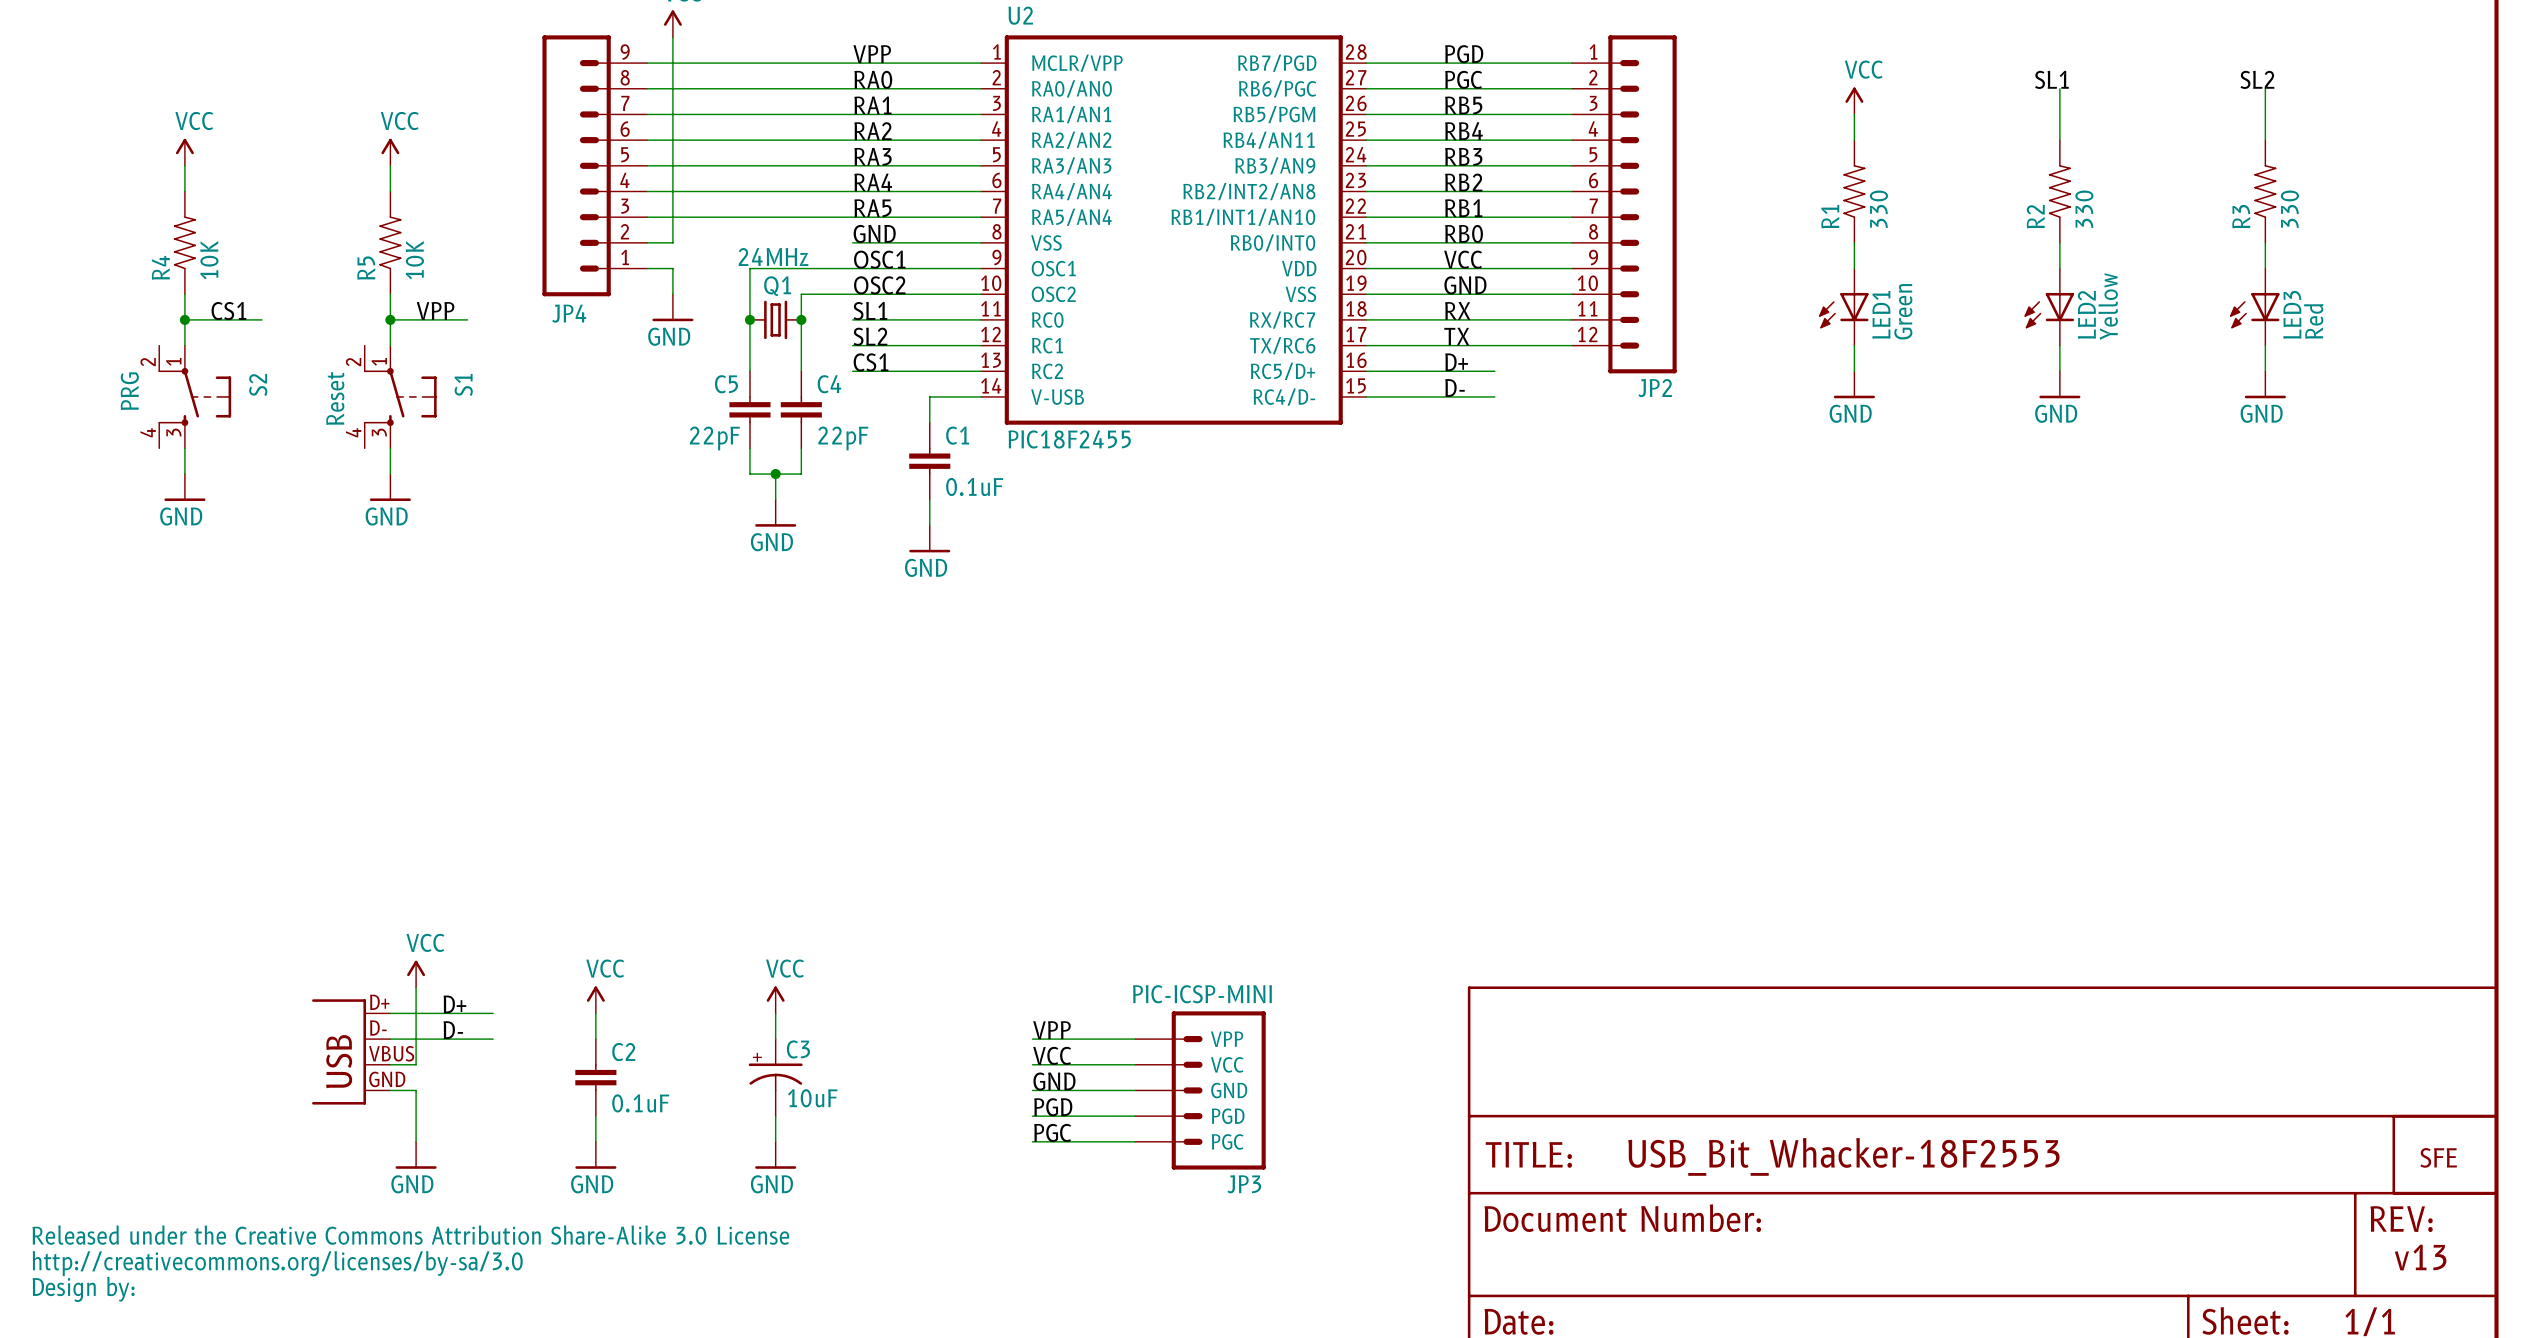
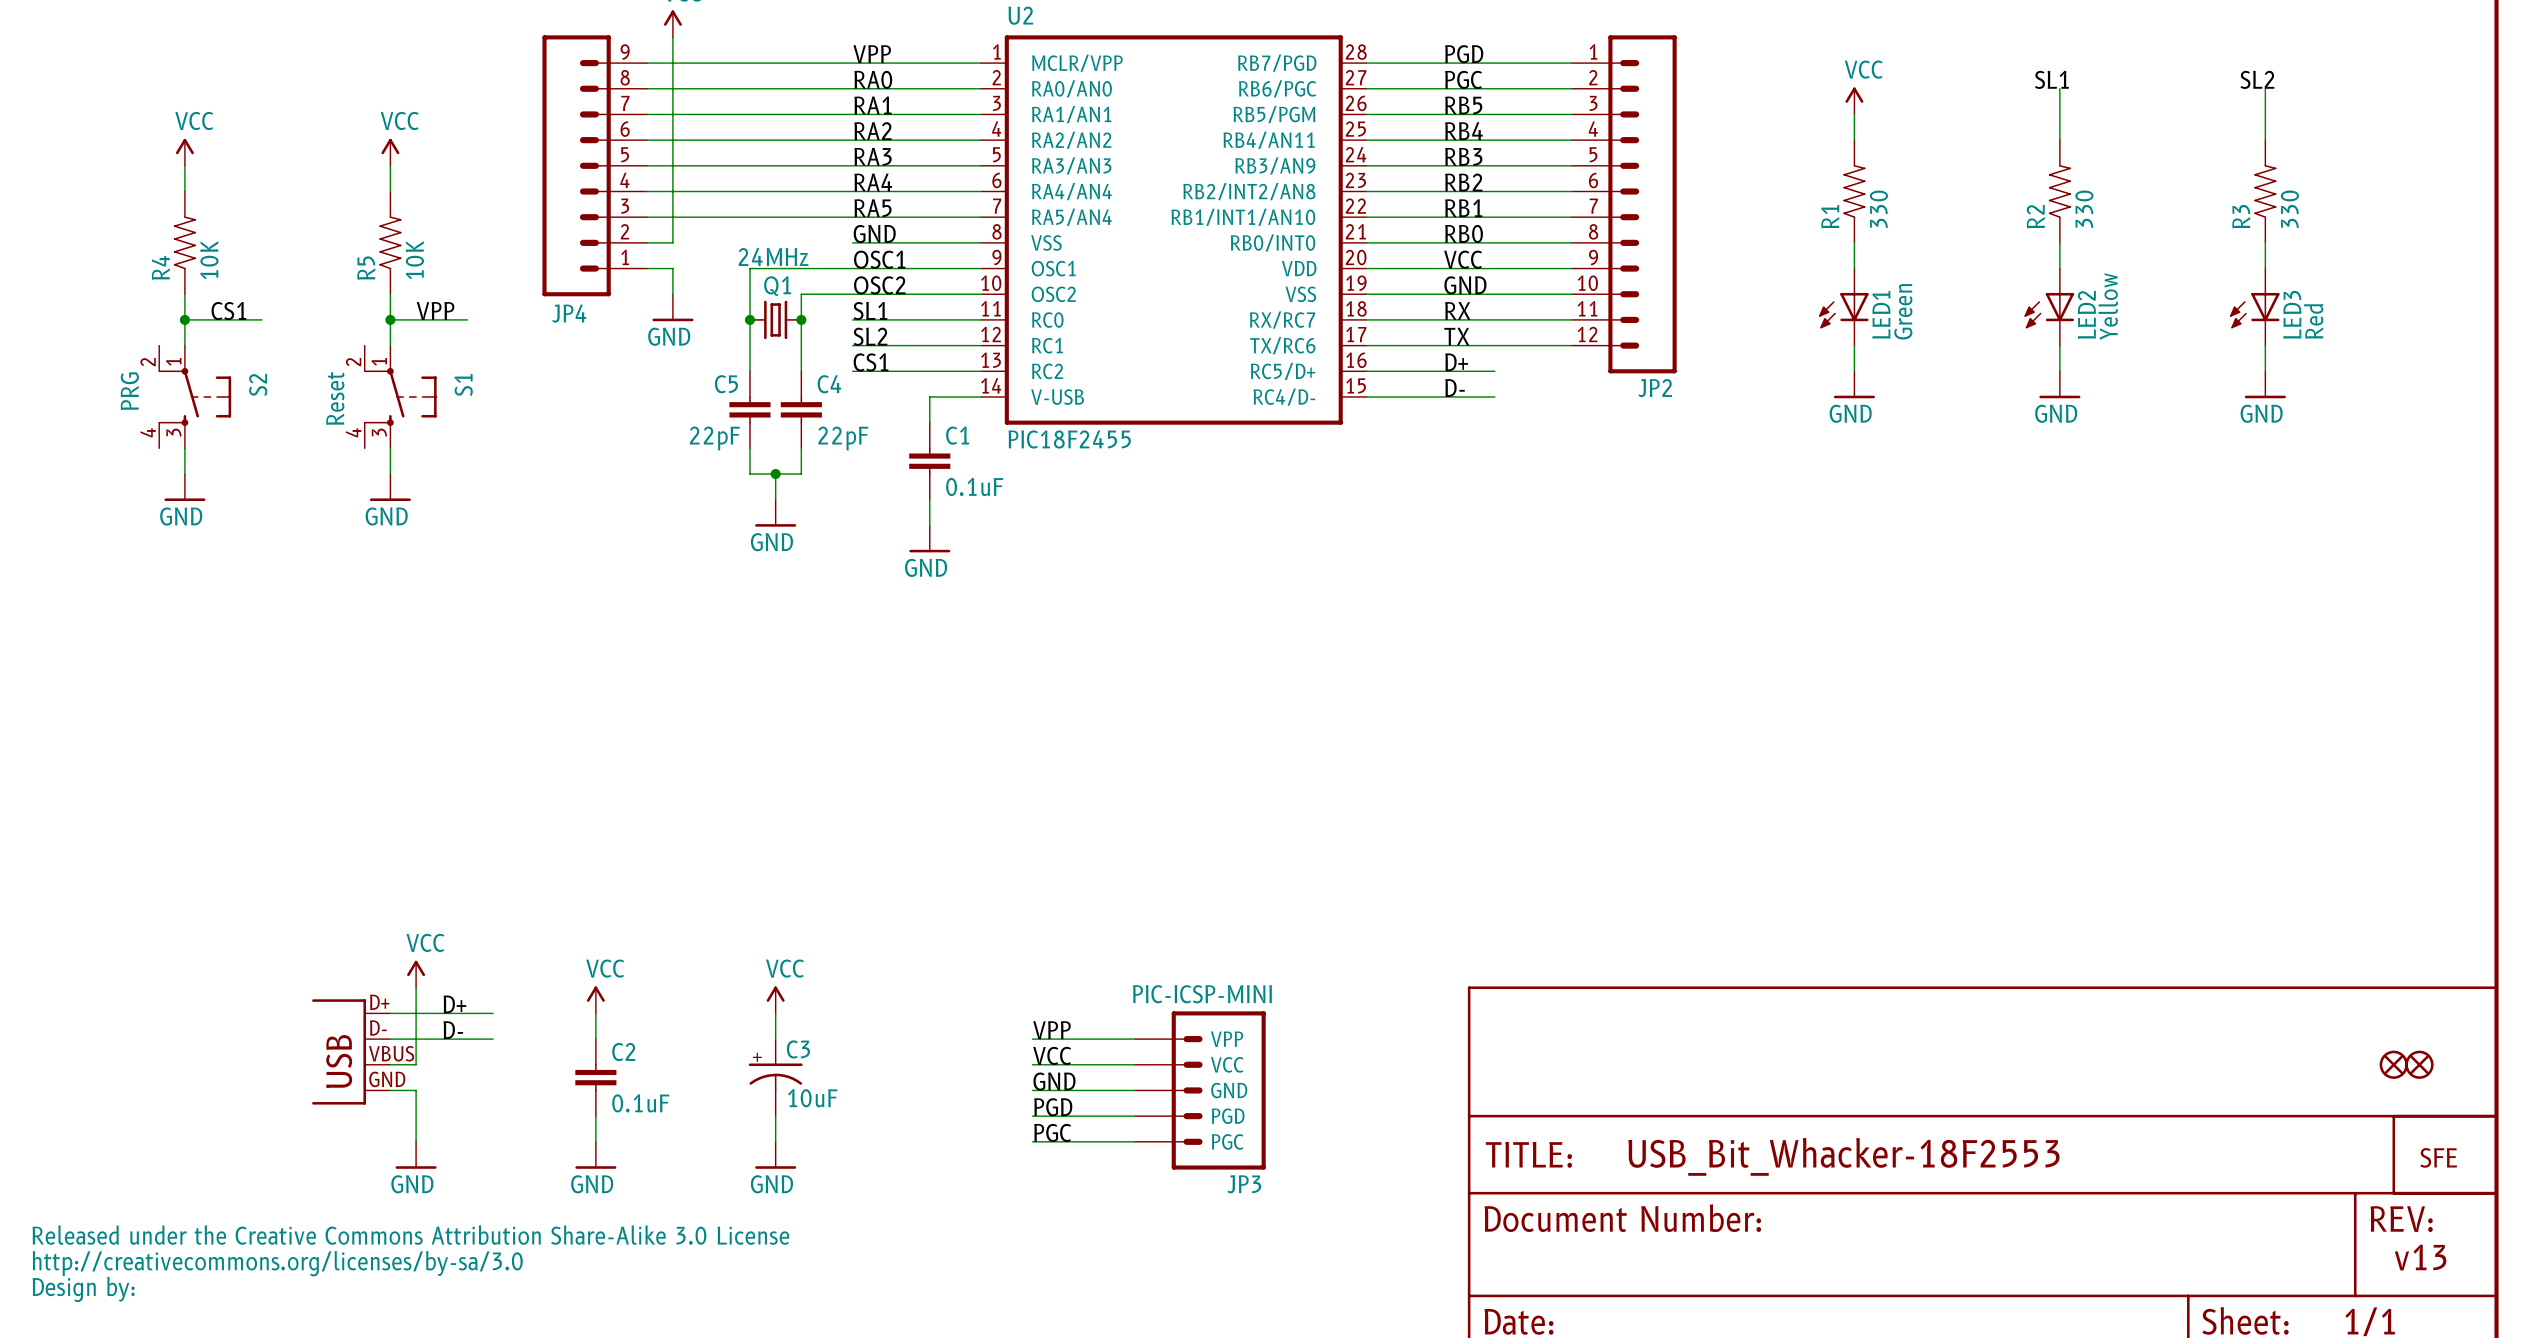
part: none -> (2393, 1064)
part: none -> (2419, 1064)

